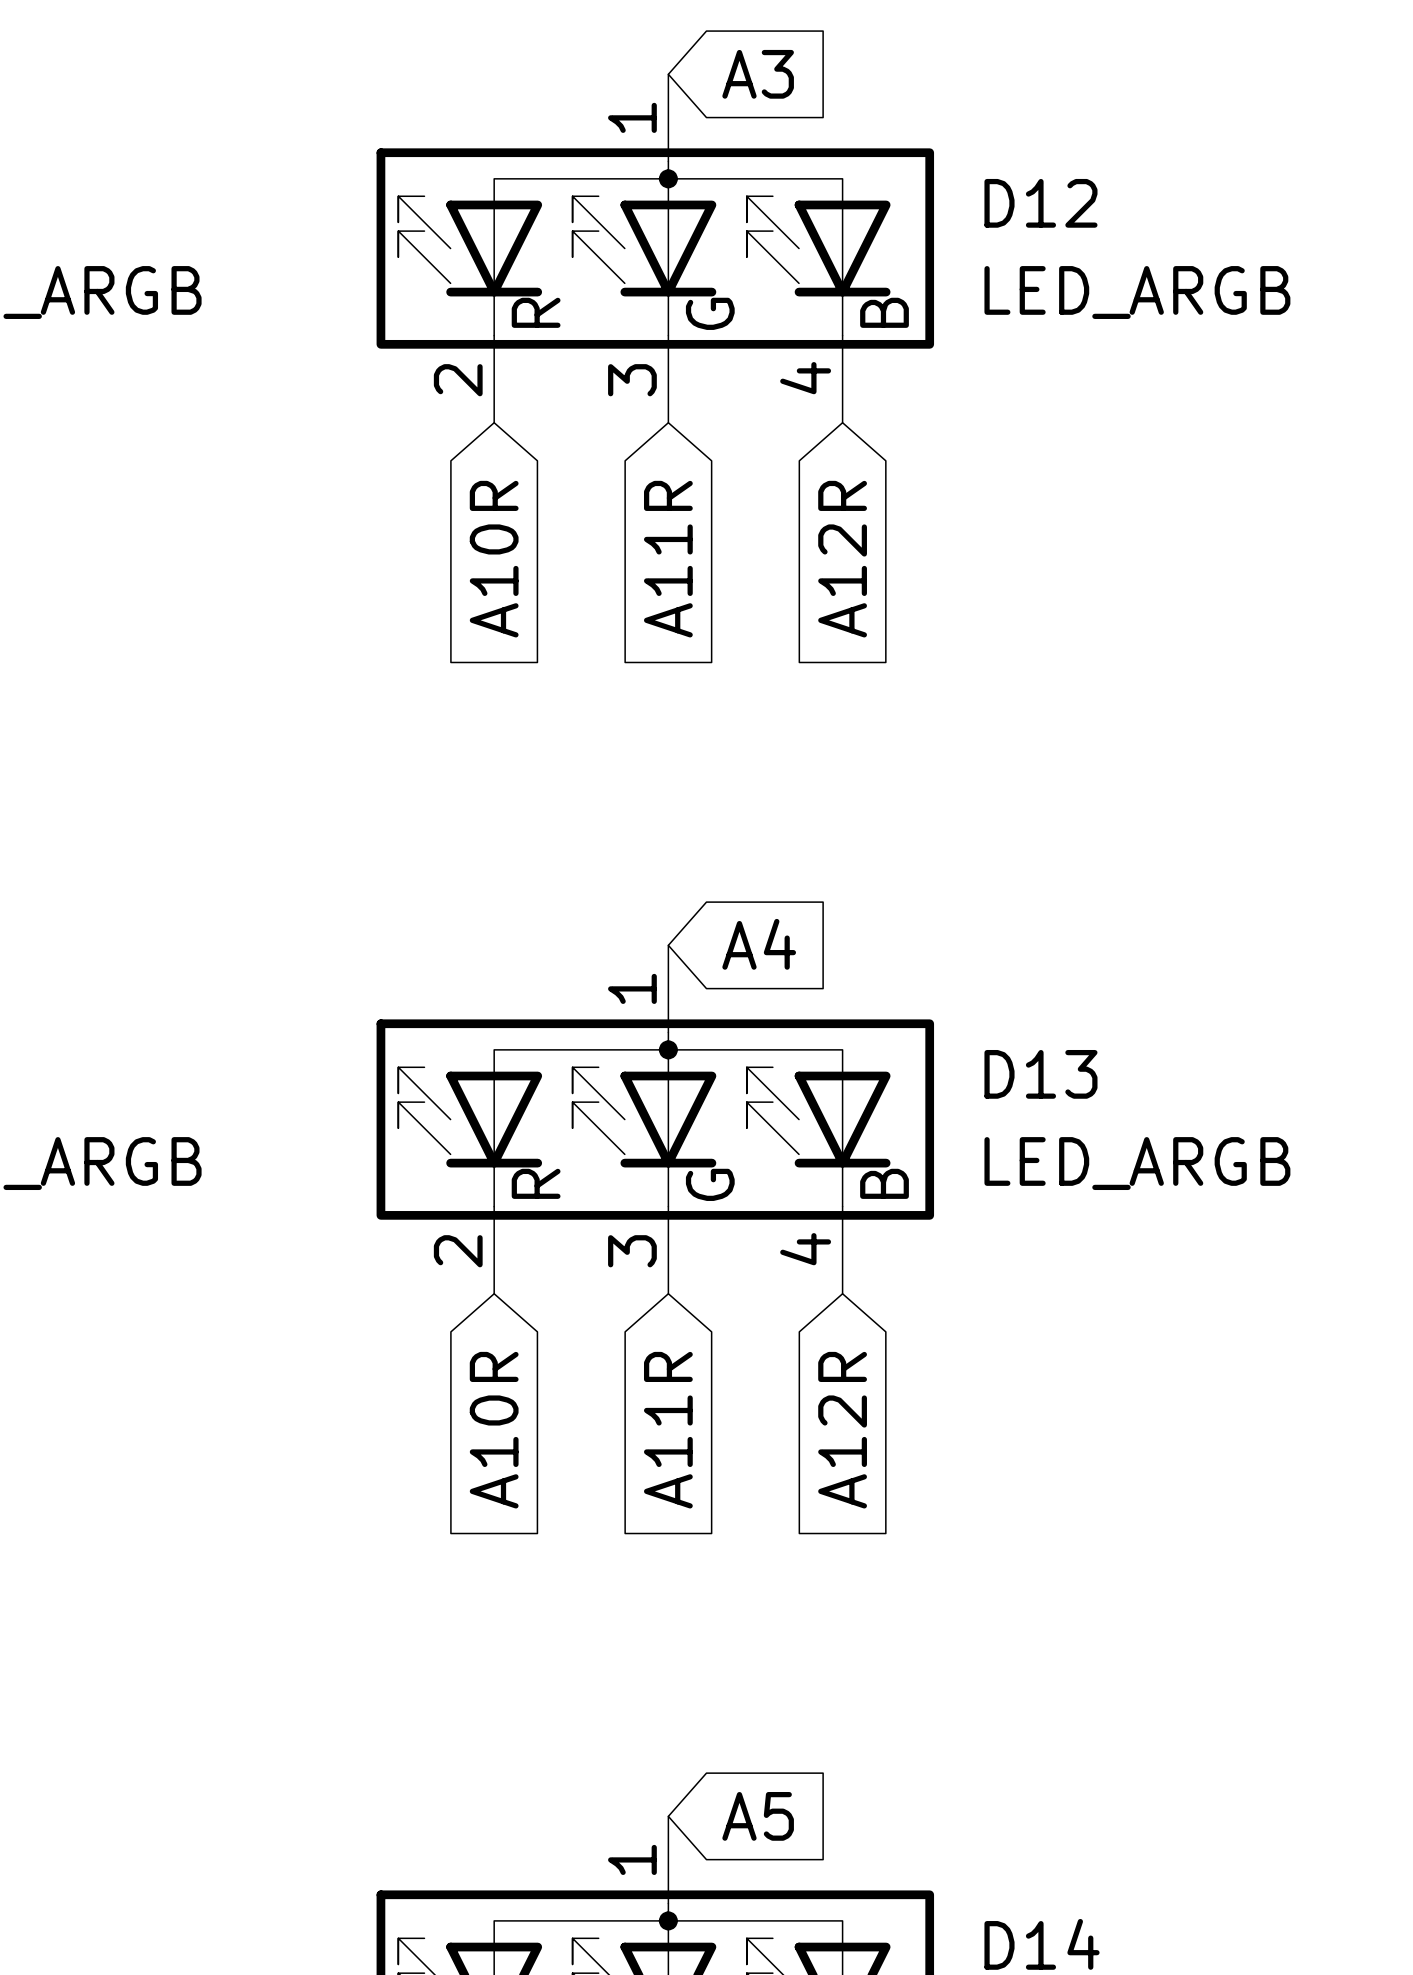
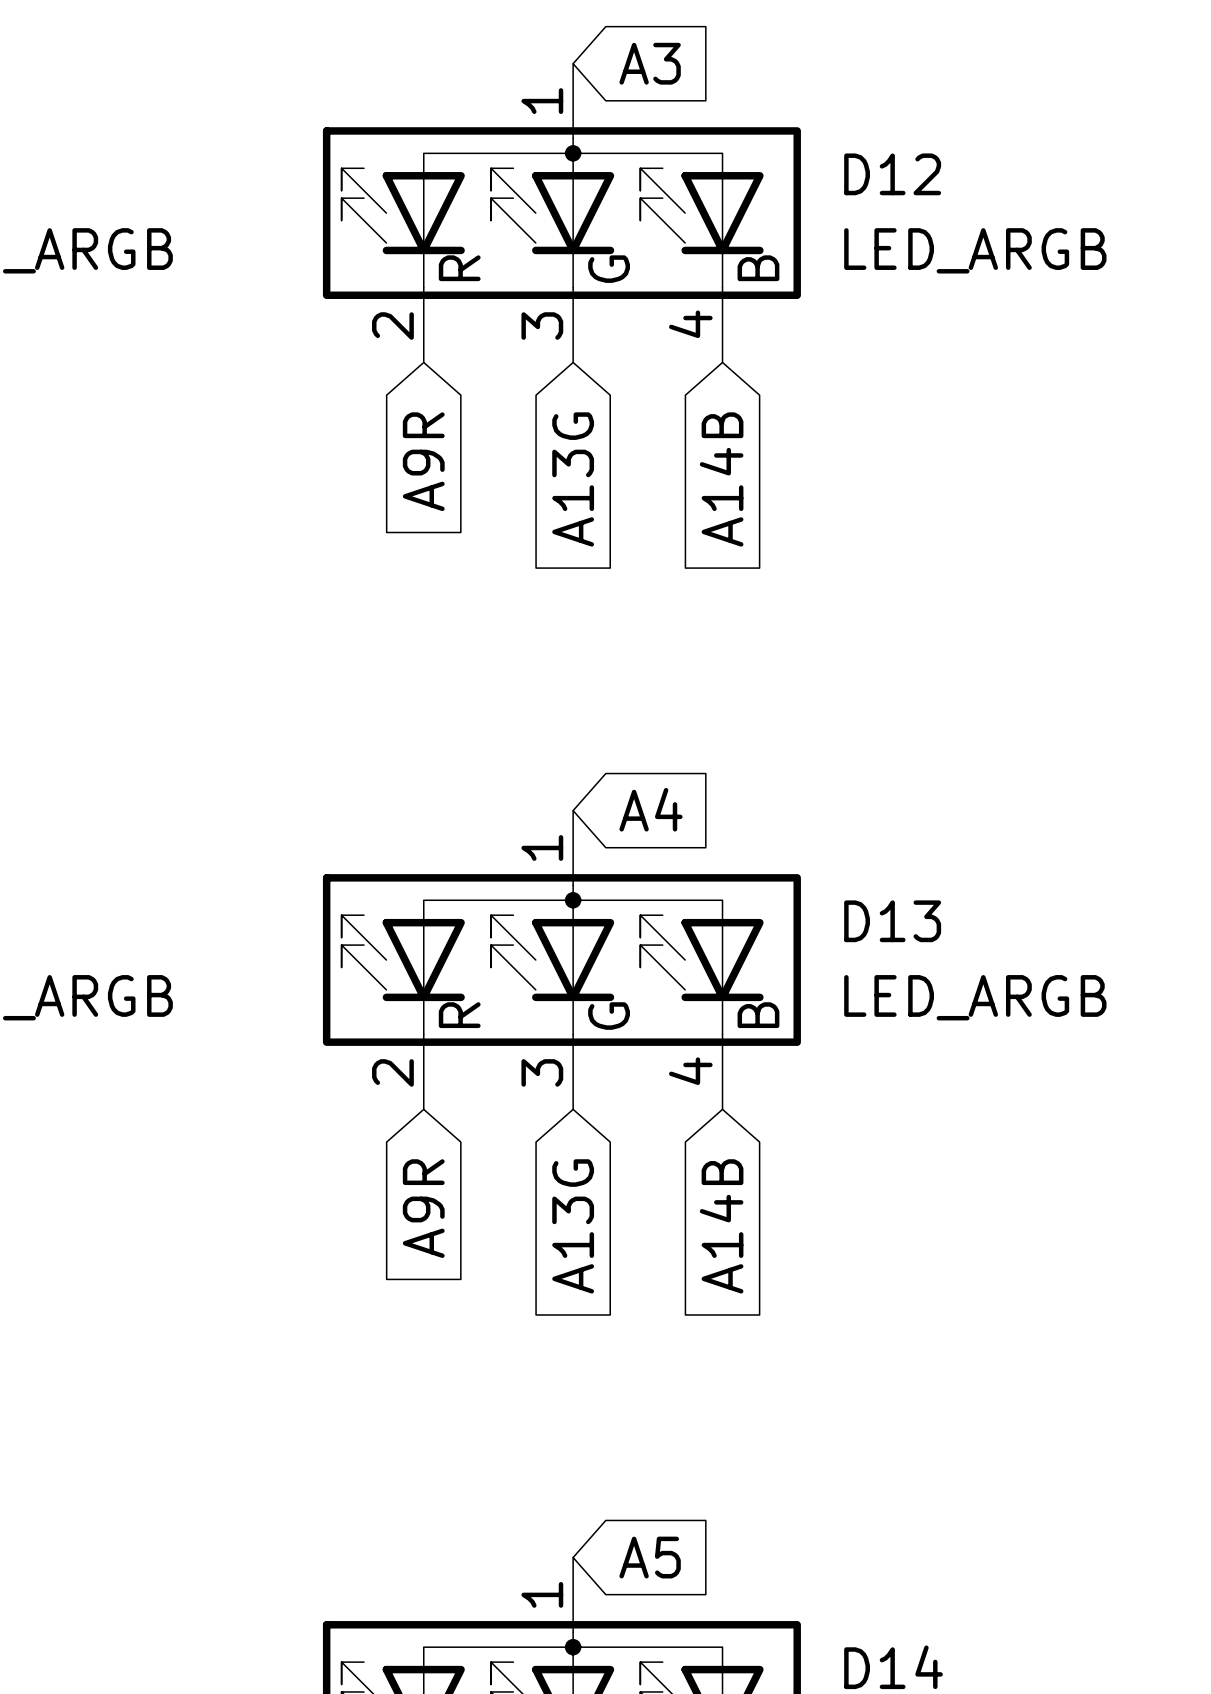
global label: A10R (494, 559) -> A9R (423, 461)
global label: A11R (668, 559) -> A13G (573, 479)
global label: A12R (842, 559) -> A14B (721, 479)
global label: A10R (494, 1430) -> A9R (423, 1208)
global label: A11R (668, 1430) -> A13G (573, 1226)
global label: A12R (842, 1430) -> A14B (721, 1226)

